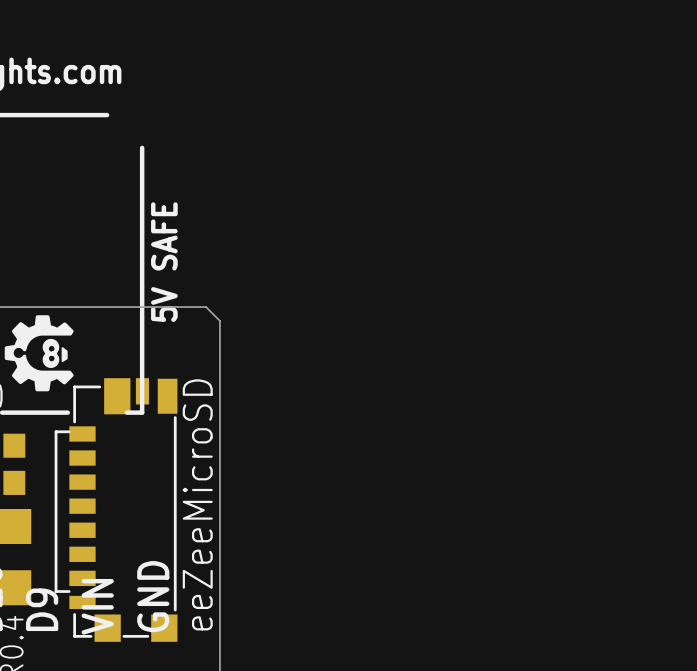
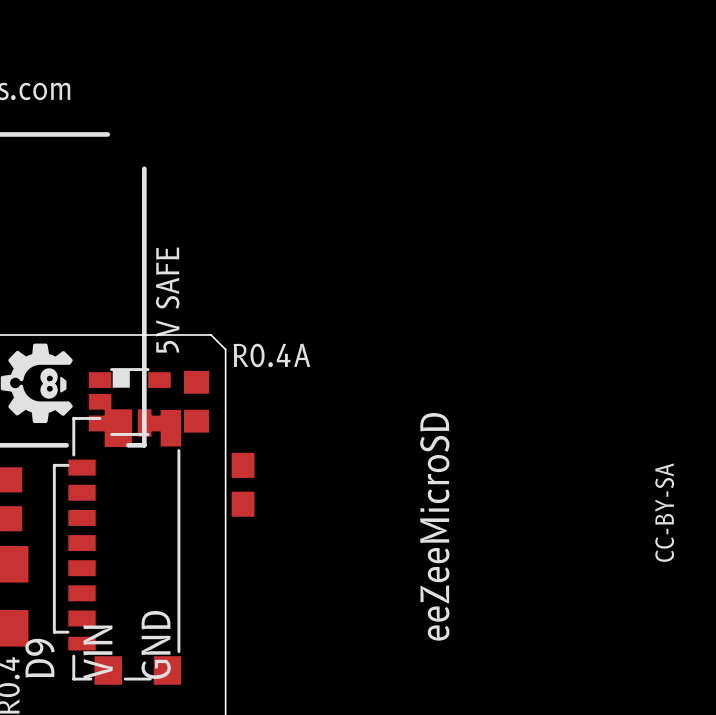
text: none -> R0.4A (271, 355)
part: none -> (196, 401)
part: none -> (129, 402)
part: none -> (243, 484)
text: none -> CC-BY-SA (664, 512)
text position: eeZeeMicroSD (197, 504) -> eeZeeMicroSD (434, 526)

